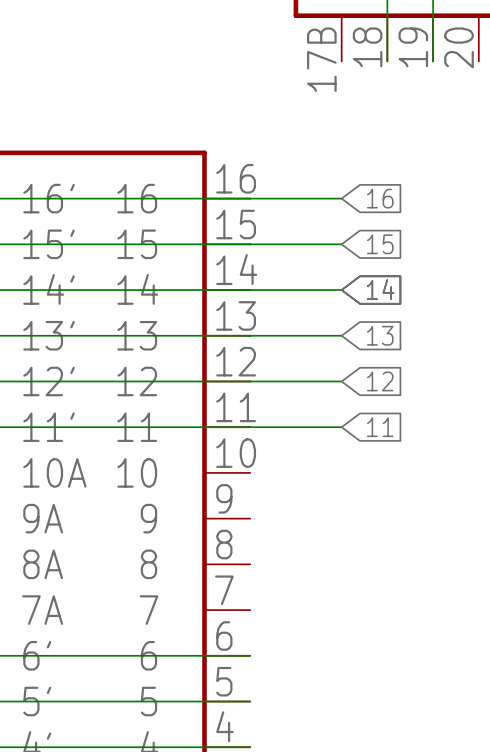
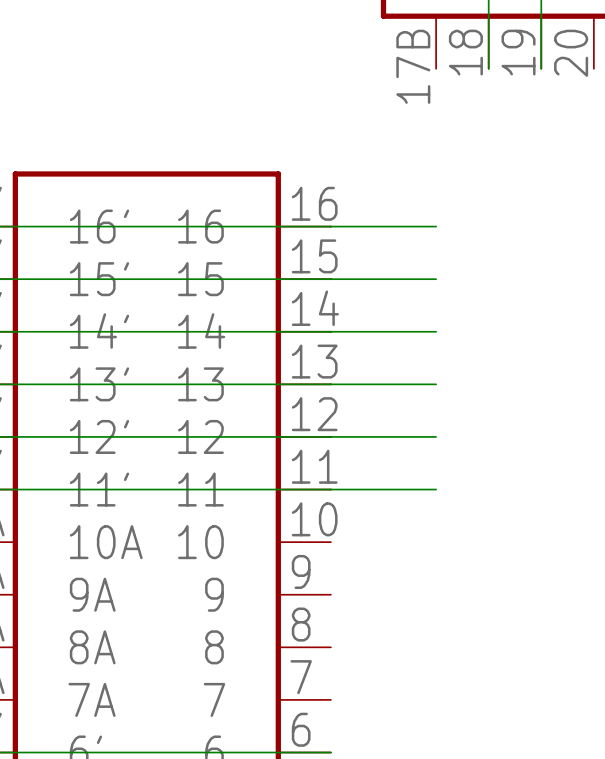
global label: 16 (380, 198) -> none
global label: 15 (380, 244) -> none
global label: 14 (380, 289) -> none
global label: 13 (380, 335) -> none
global label: 12 (380, 381) -> none
global label: 11 (380, 427) -> none

